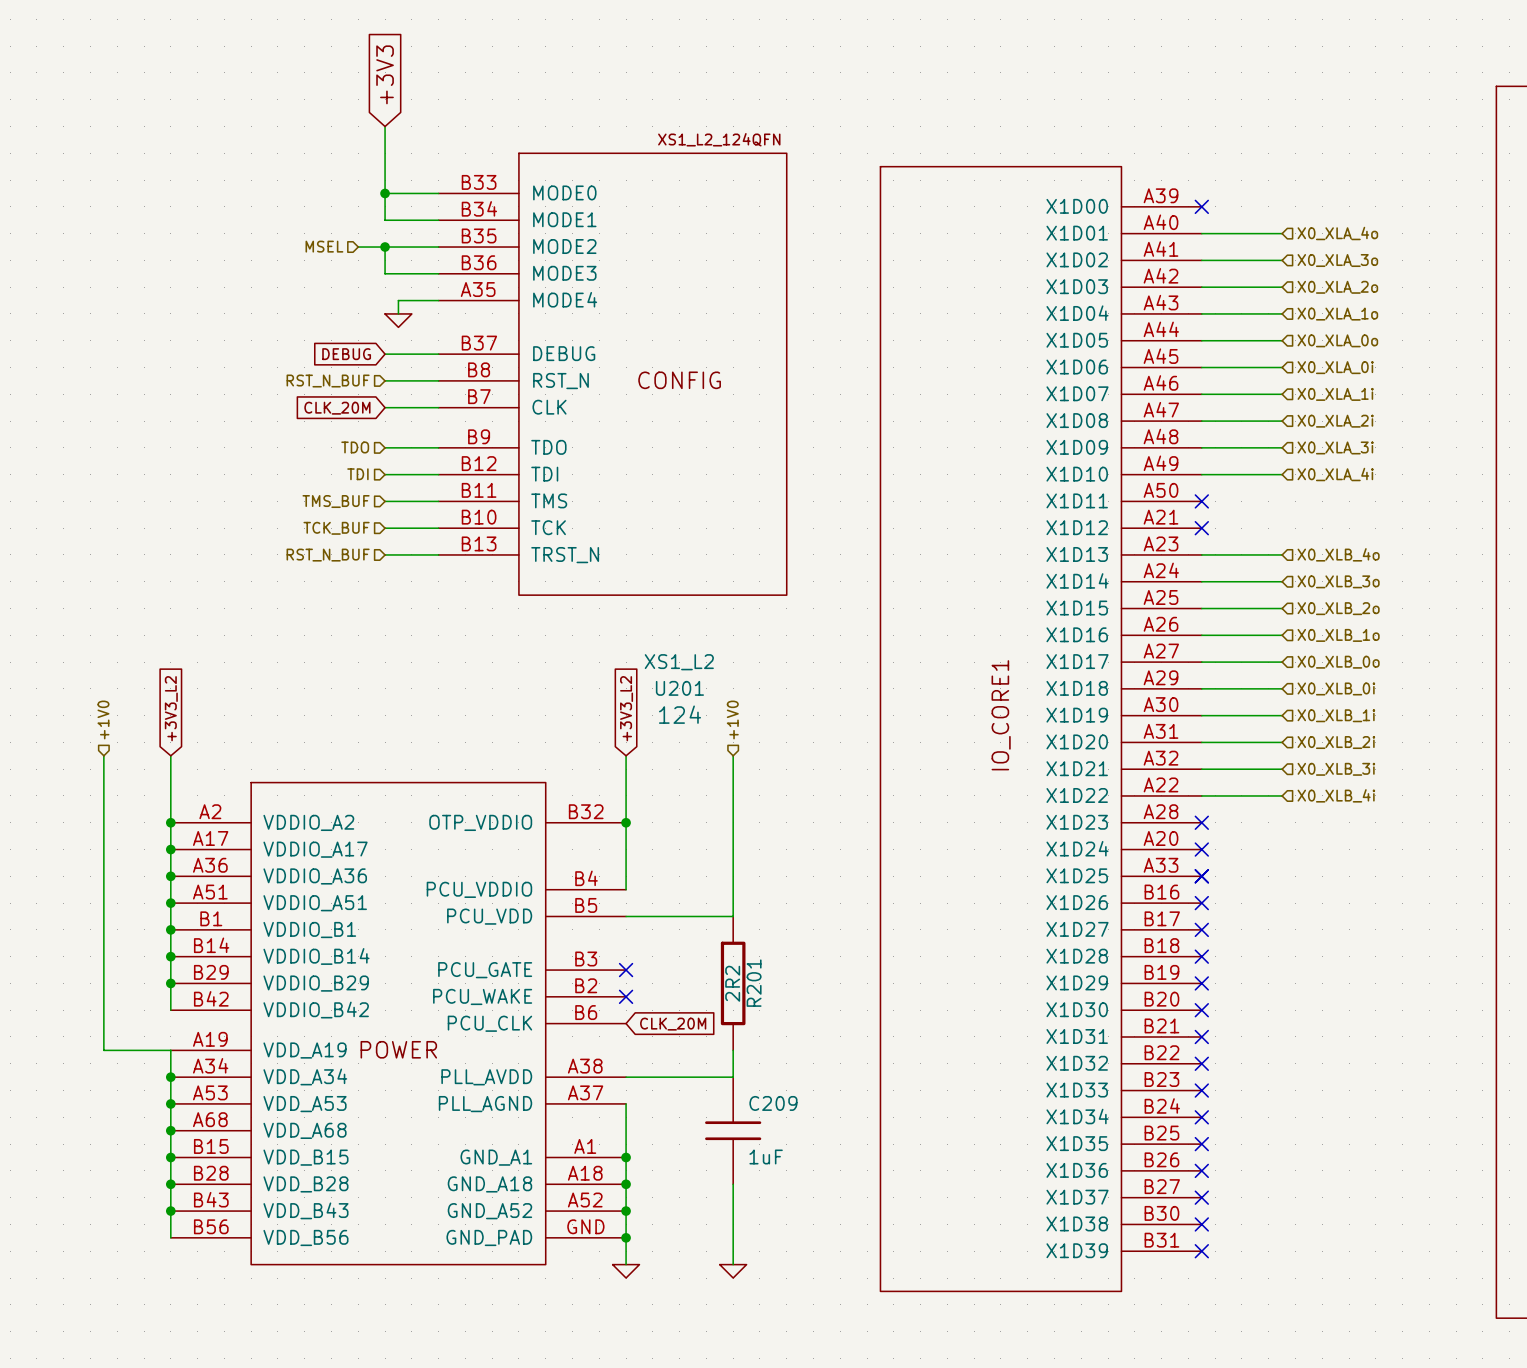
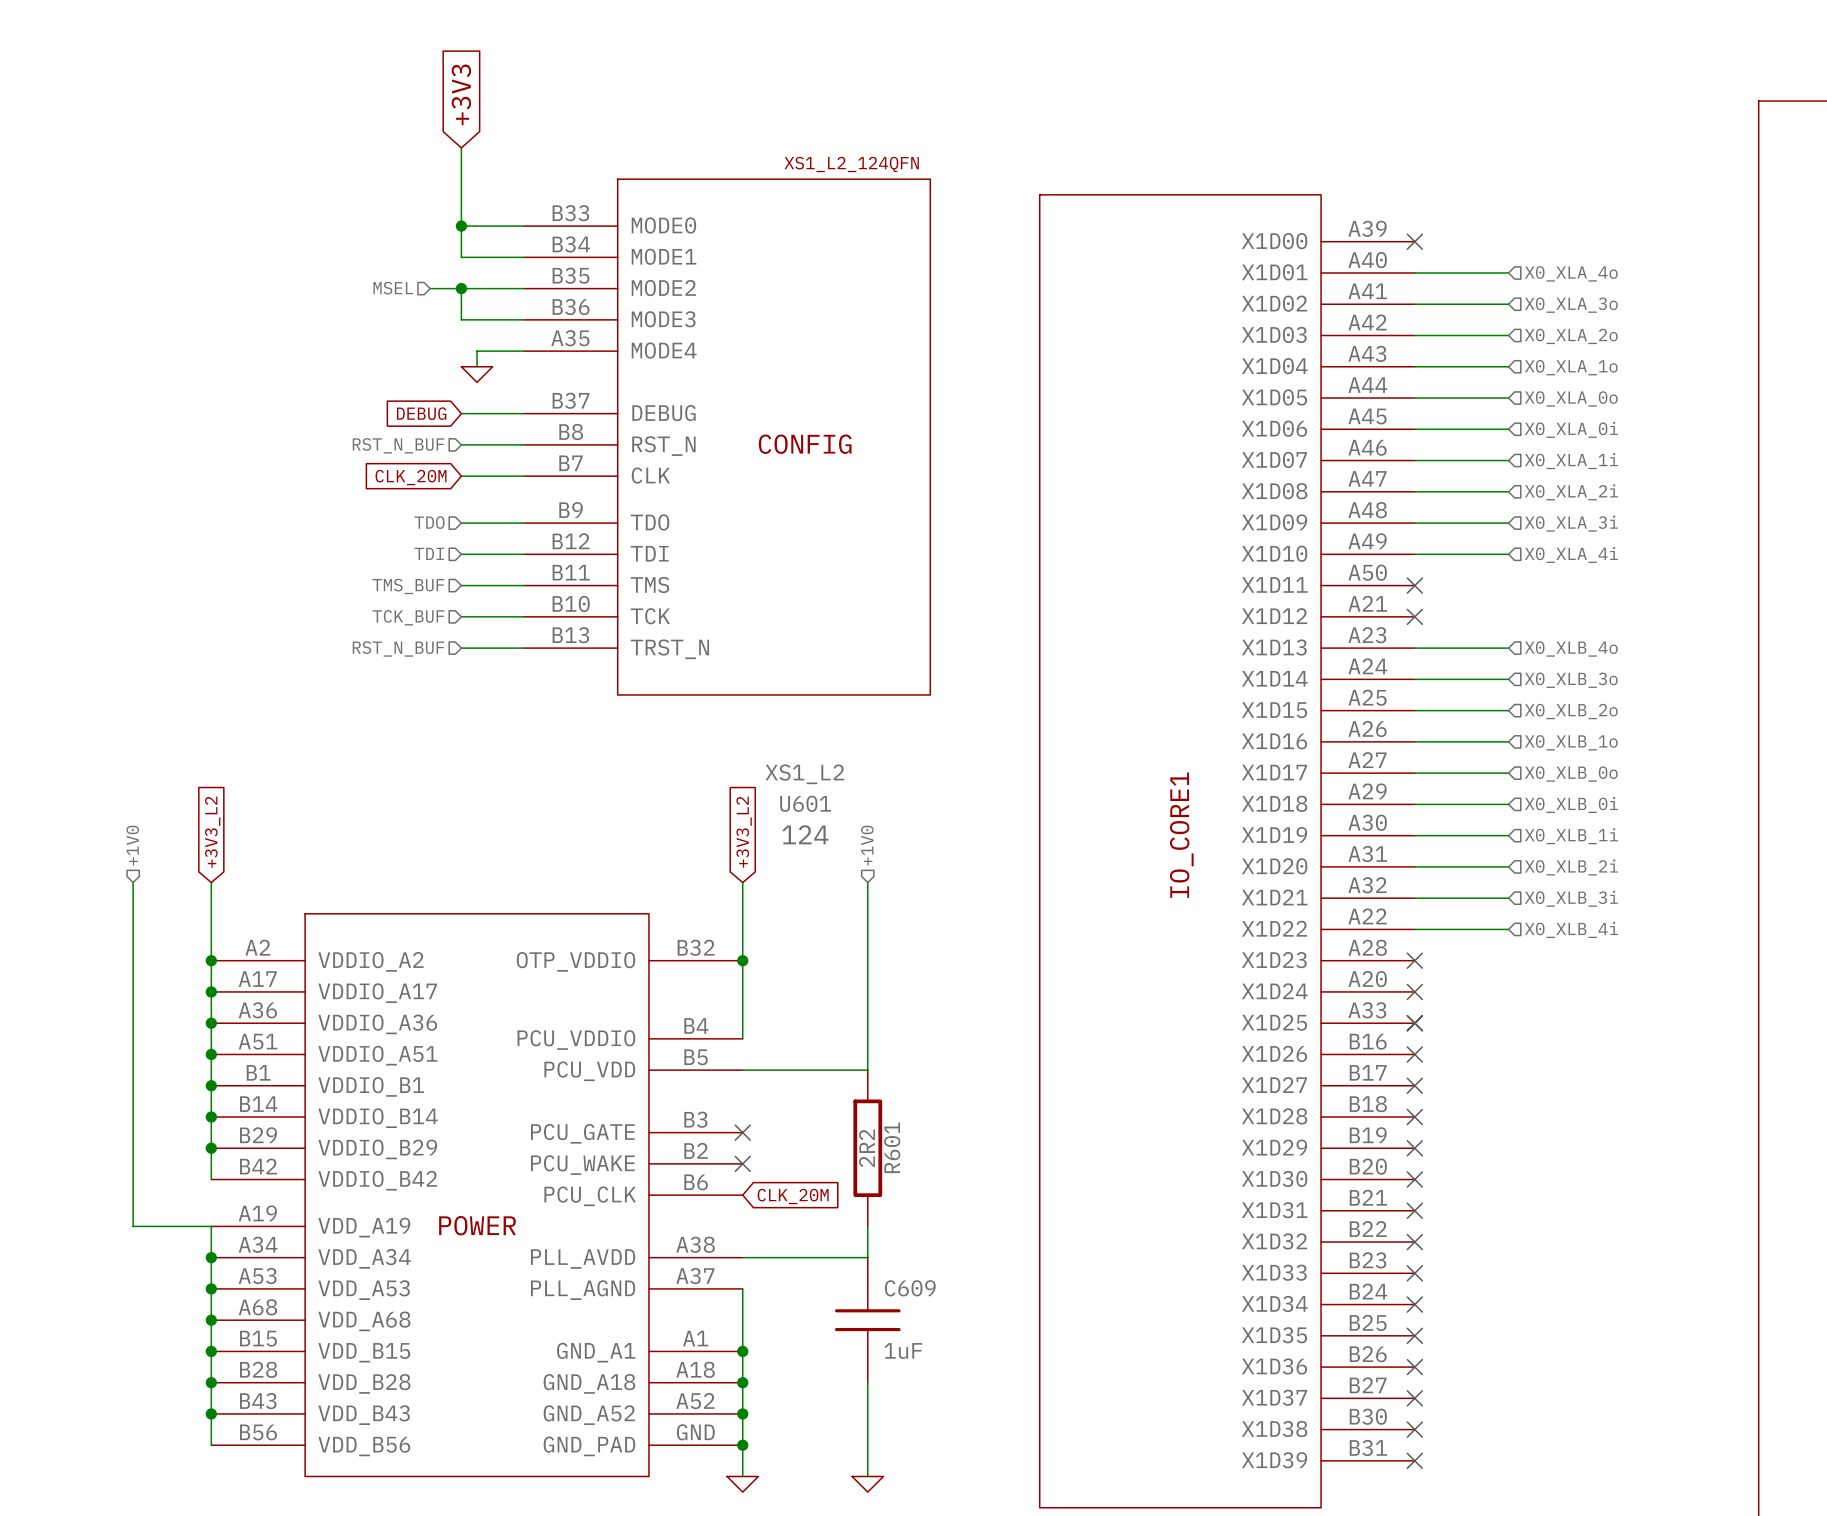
U201 name: U201 (679, 688) -> U601 (805, 803)
R201 name: R201 (754, 983) -> R601 (892, 1147)
C209 name: C209 (773, 1103) -> C609 (910, 1288)

